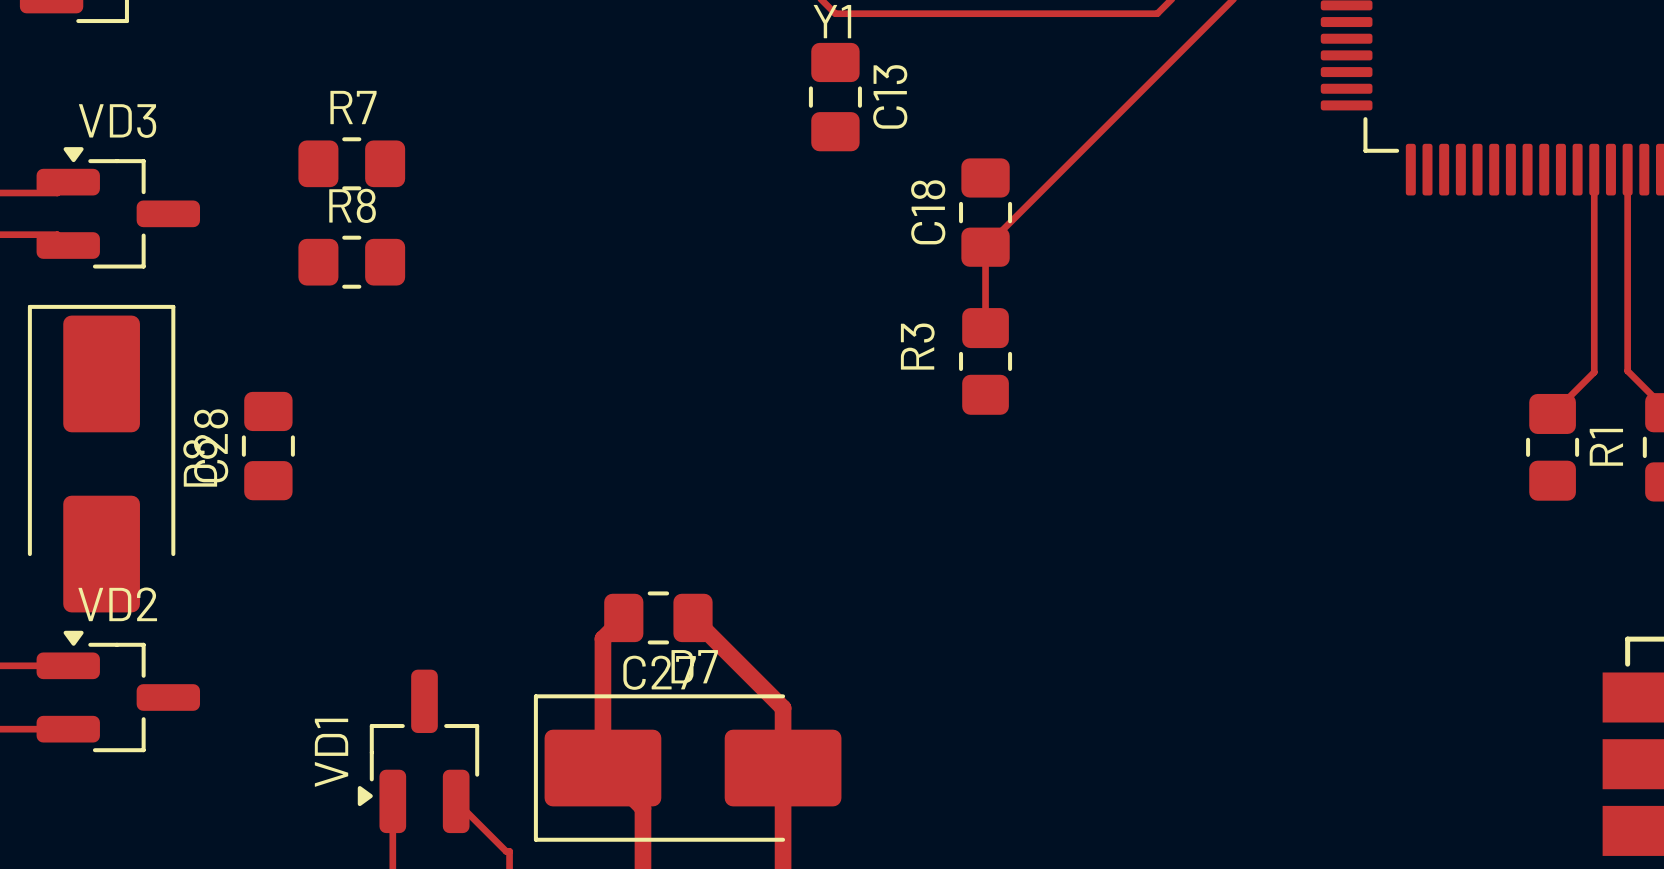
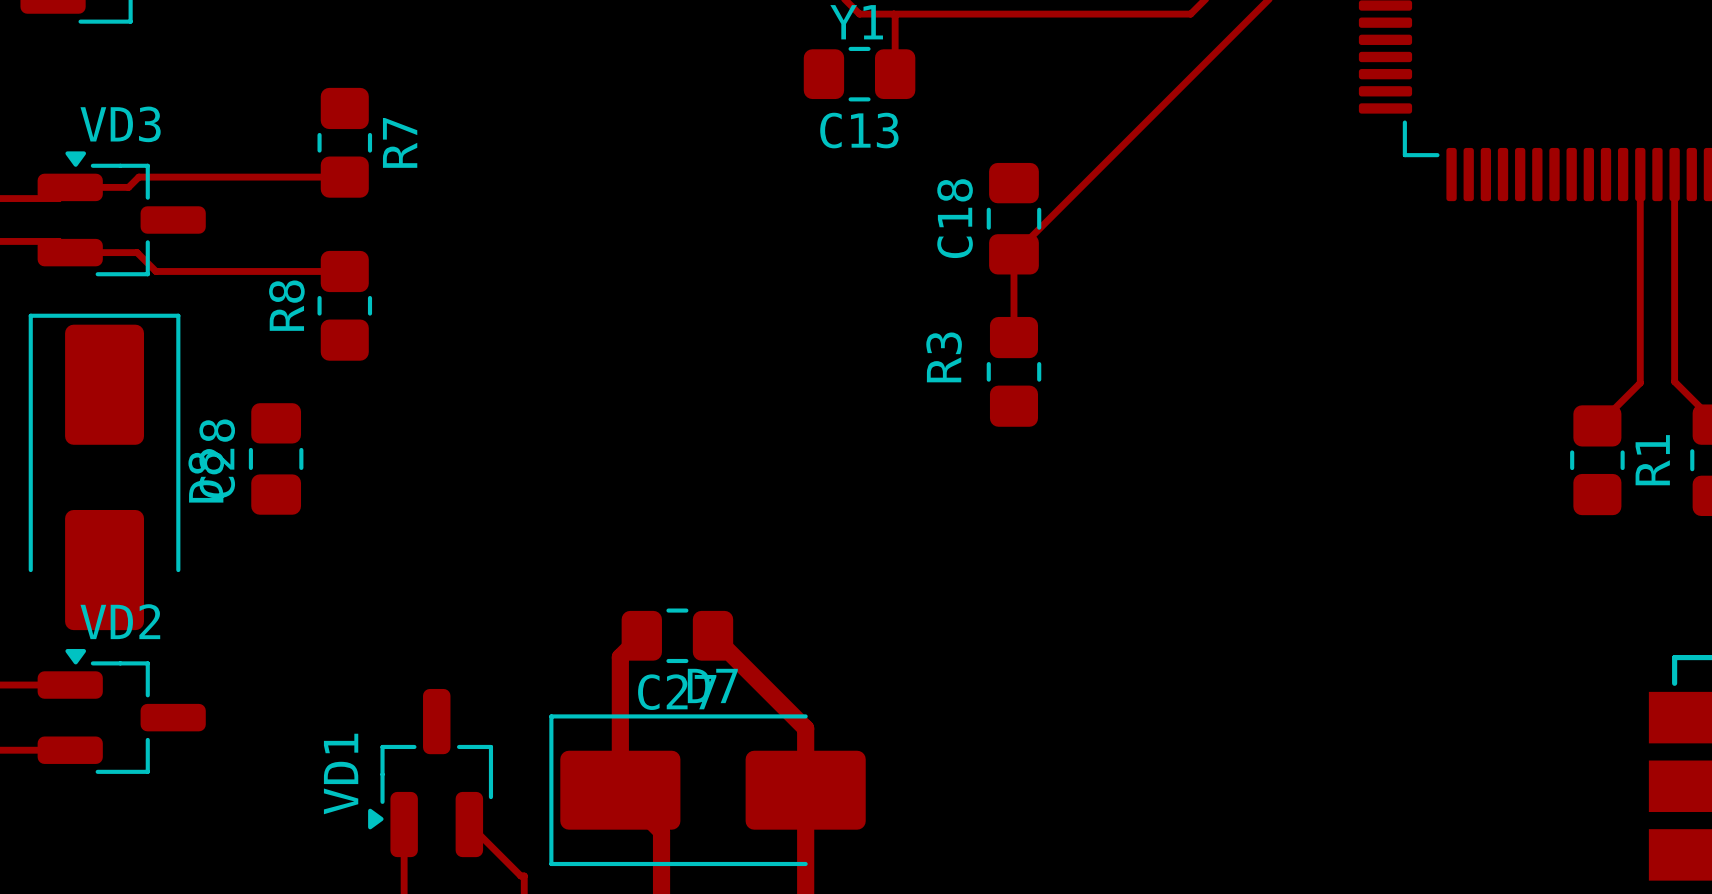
track: none -> (893, 14) (895, 74)
C13 rotation: 0° (835, 97) -> 90° clockwise (859, 74)
R7 rotation: 0° (351, 163) -> 90° clockwise (344, 142)
track: none -> (344, 177) (138, 177) (128, 187) (70, 187)
R8 name position: R8 (352, 205) -> R8 (286, 305)
track: none -> (70, 252) (137, 252) (156, 271) (344, 271)
R8 rotation: 0° (351, 262) -> 90° clockwise (344, 305)

